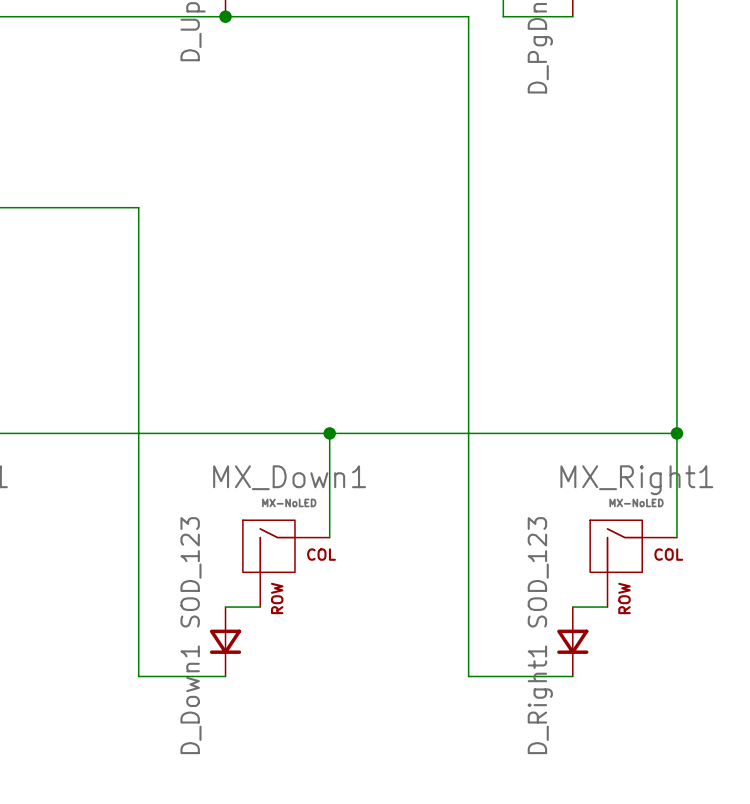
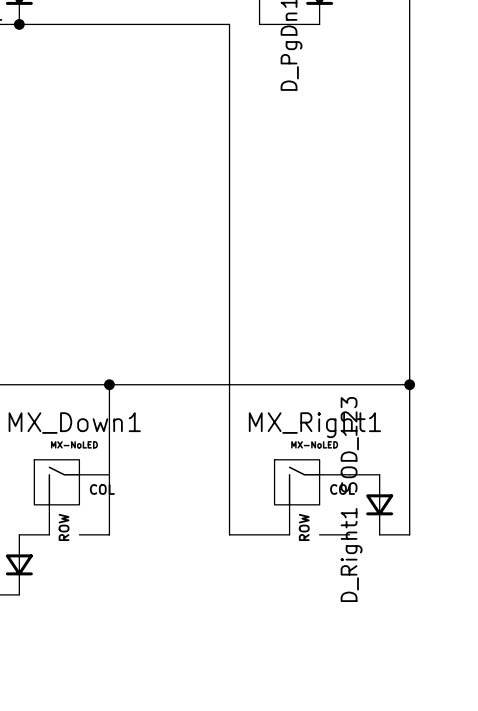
wire: none -> (109, 474) (109, 534) (79, 534)
wire: none -> (409, 474) (409, 534) (379, 534)
MX_Right1 position: (633, 563) -> (312, 497)
wire: (468, 607) (468, 676) (572, 676) -> (229, 534) (289, 534)
D_Right1 position: (572, 641) -> (379, 504)

